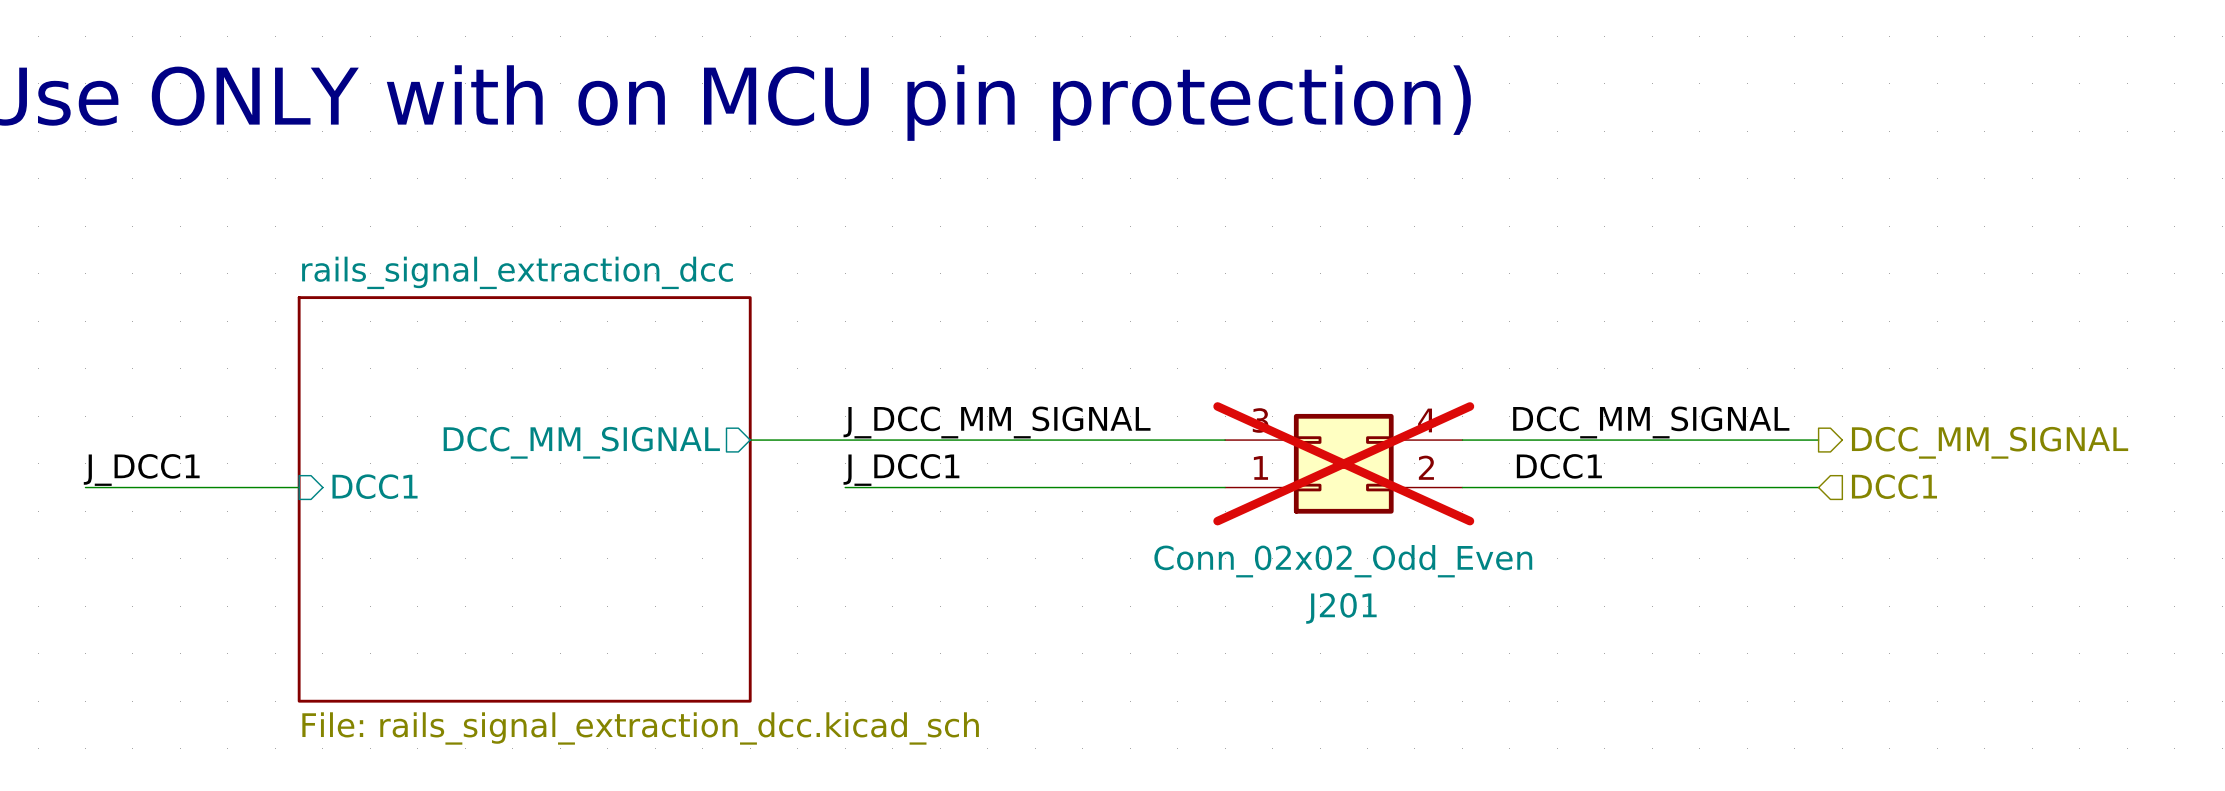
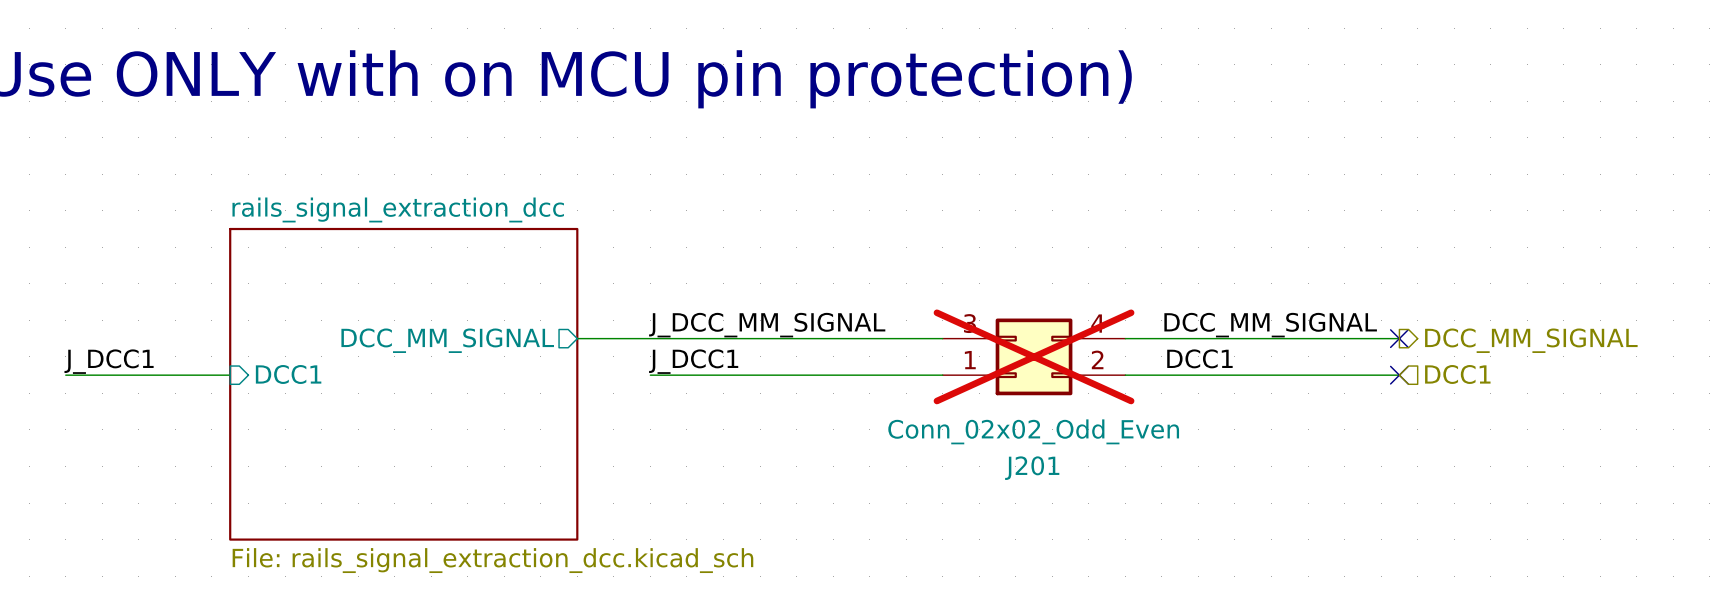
no-connect mark: none -> (1399, 338)
no-connect mark: none -> (1399, 375)

